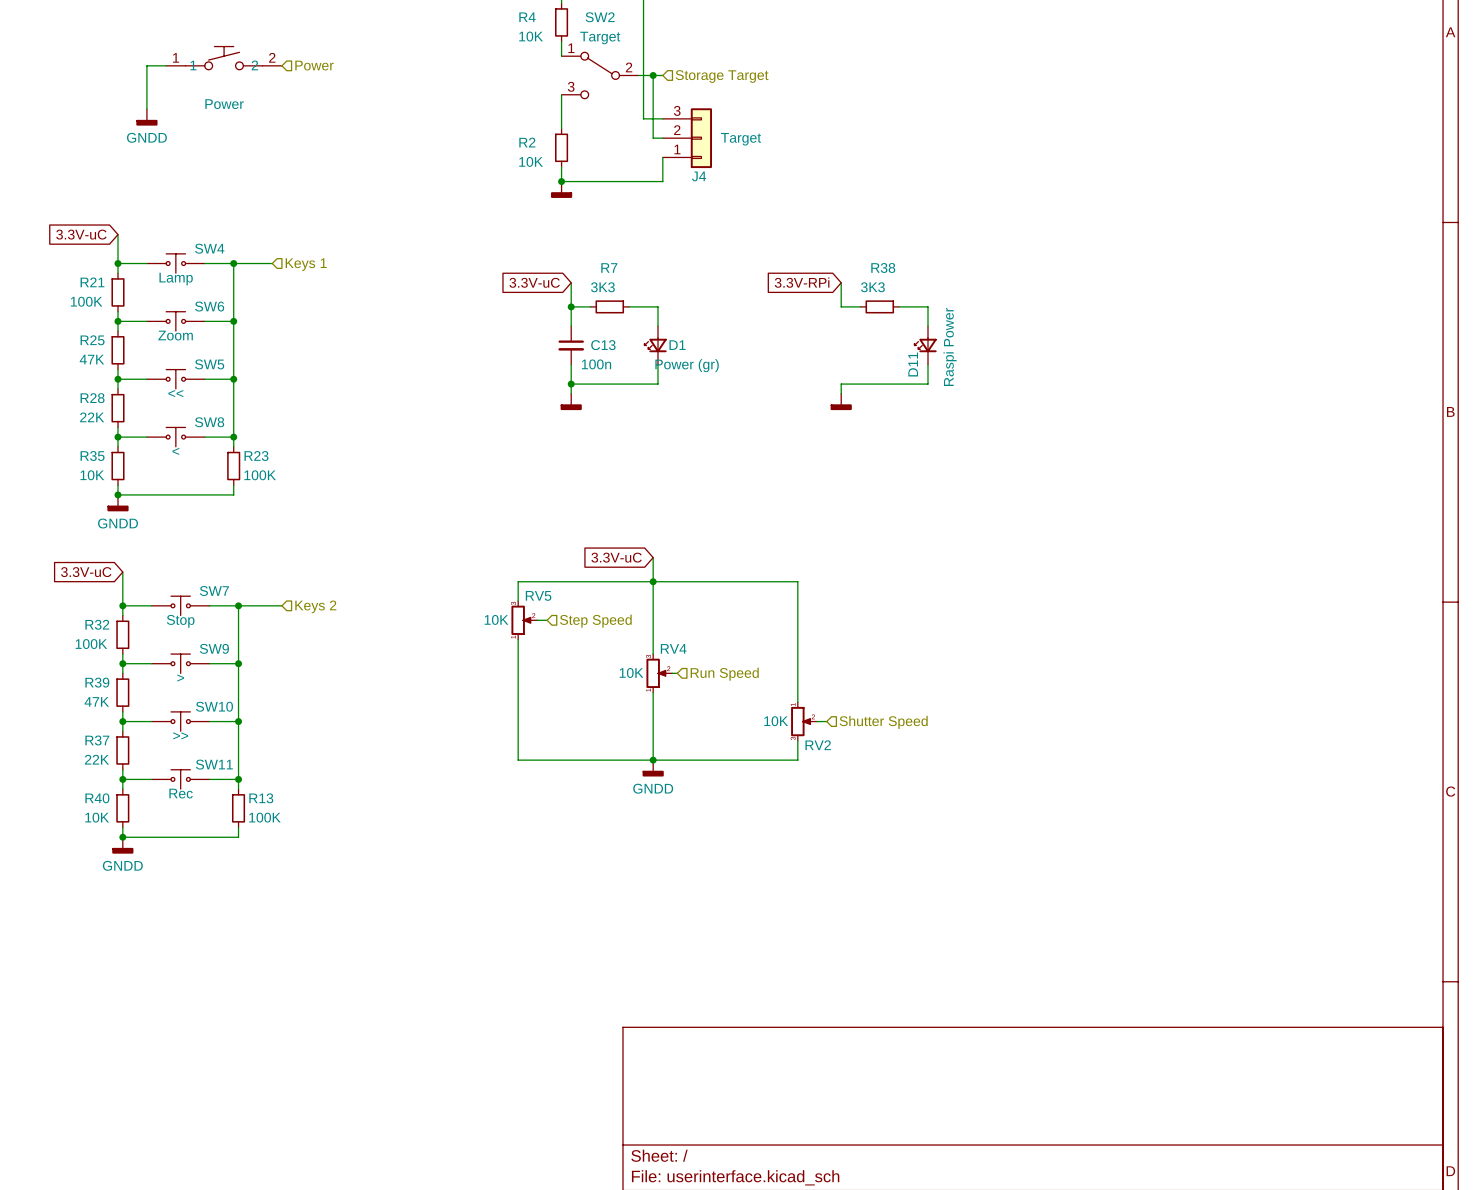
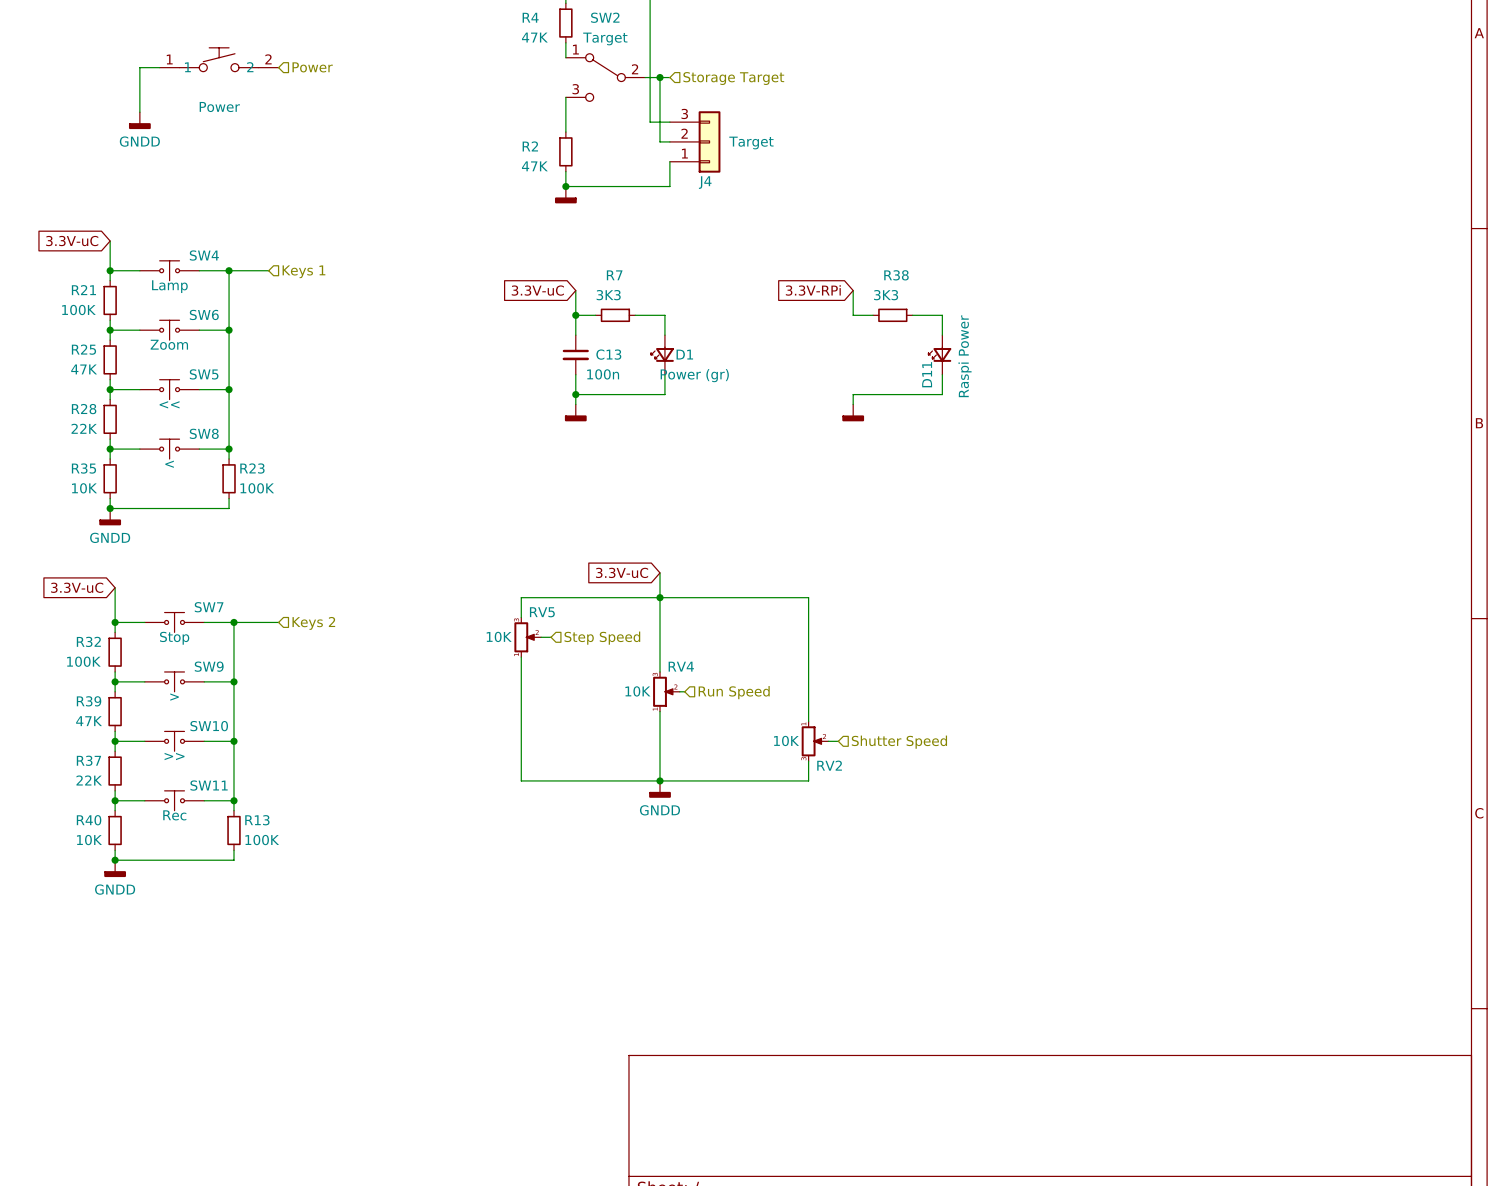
R4 value: 10K (531, 36) -> 47K (534, 37)
R2 value: 10K (531, 161) -> 47K (534, 166)

